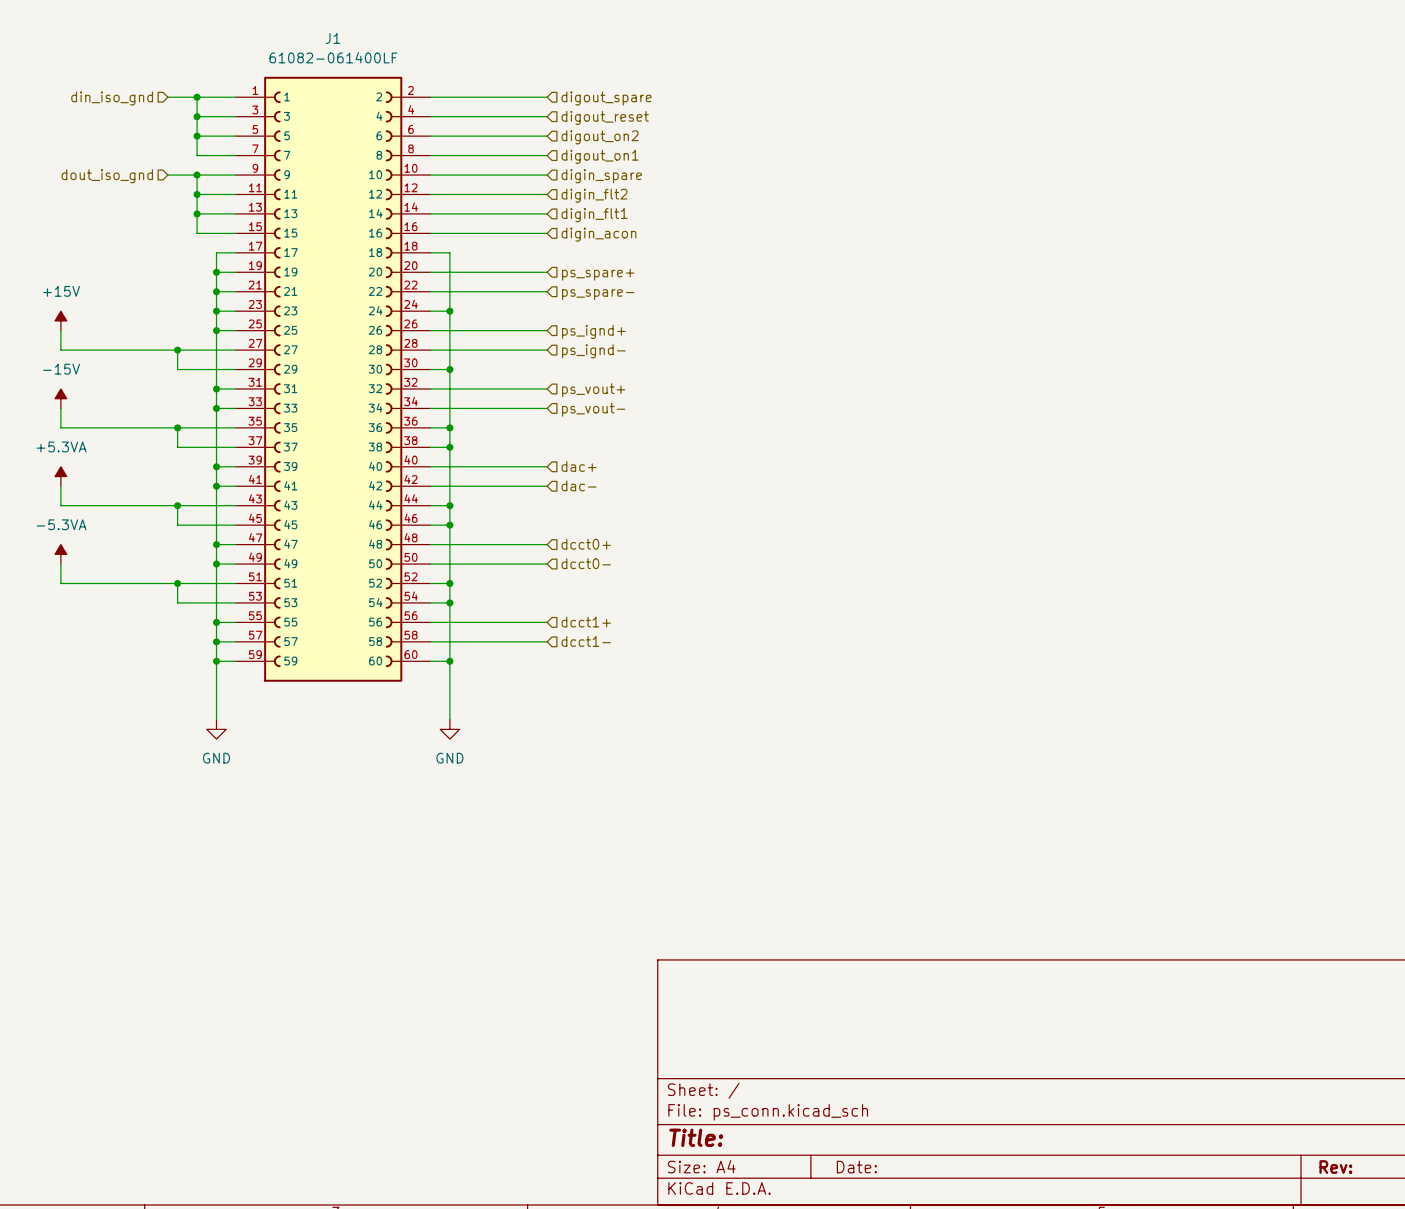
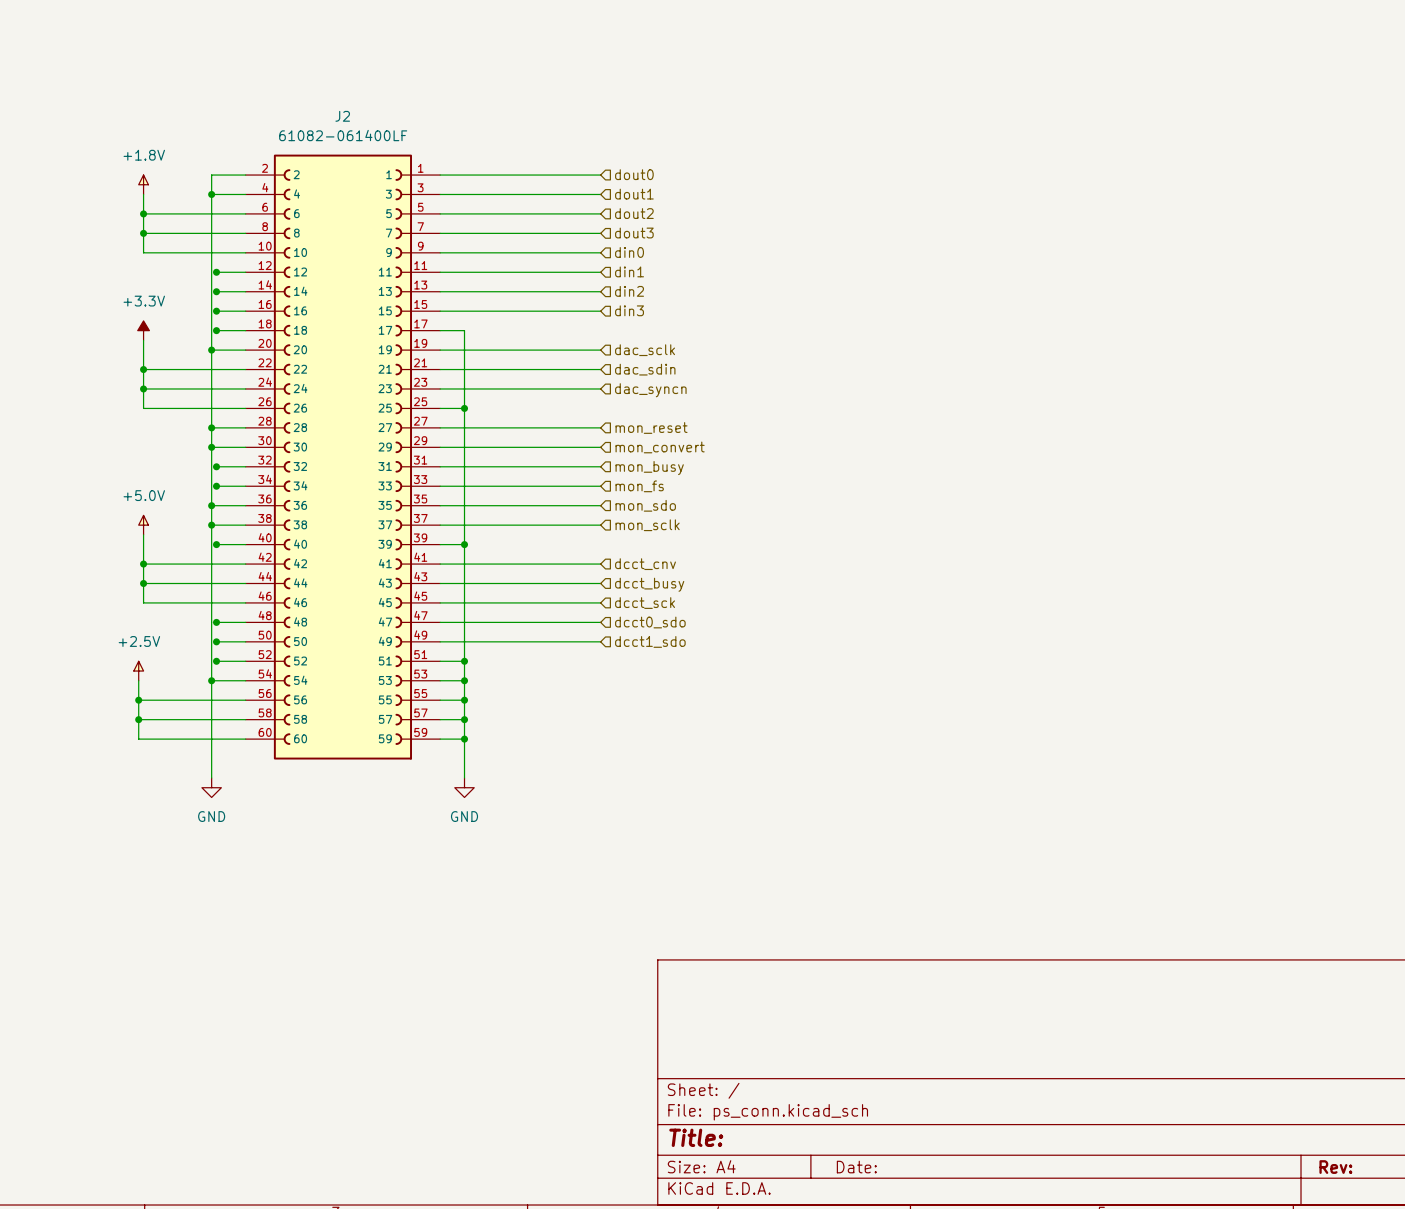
wire: (167, 97) (235, 97) -> none
wire: (197, 97) (197, 155) (235, 155) -> none
junction: (197, 97) -> none
wire: (430, 97) (547, 97) -> none
hierarchical label: din_iso_gnd (112, 98) -> none
hierarchical label: digout_spare (606, 98) -> none
wire: (197, 116) (235, 116) -> none
junction: (197, 116) -> none
wire: (430, 116) (547, 116) -> none
hierarchical label: digout_reset (605, 117) -> none
wire: (197, 136) (235, 136) -> none
junction: (197, 136) -> none
wire: (430, 136) (547, 136) -> none
hierarchical label: digout_on2 (600, 137) -> none
wire: (430, 155) (547, 155) -> none
hierarchical label: digout_on1 (600, 156) -> none
hierarchical label: none -> dout0 (634, 174)
wire: (167, 175) (211, 175) -> (211, 778) (211, 175)
wire: (197, 175) (197, 233) -> (143, 233) (197, 233)
junction: (197, 175) -> none
wire: none -> (547, 175) (600, 175)
hierarchical label: dout_iso_gnd (107, 176) -> none
hierarchical label: digin_spare (601, 176) -> none
power symbol: none -> +1.8V (143, 184)
wire: (197, 194) (211, 194) -> none
junction: (197, 194) -> none
junction: none -> (211, 194)
wire: none -> (547, 194) (600, 194)
hierarchical label: none -> dout1 (634, 194)
hierarchical label: digin_flt2 (594, 195) -> none
wire: none -> (143, 213) (197, 213)
junction: none -> (143, 213)
junction: (197, 213) -> none
wire: none -> (547, 213) (600, 213)
hierarchical label: none -> dout2 (634, 213)
hierarchical label: digin_flt1 (594, 215) -> none
junction: none -> (143, 233)
wire: none -> (547, 233) (600, 233)
hierarchical label: none -> dout3 (634, 233)
hierarchical label: digin_acon (598, 234) -> none
wire: (216, 252) (216, 719) -> (216, 252) (143, 252) (143, 194)
wire: (449, 252) (449, 719) -> (449, 252) (600, 252)
hierarchical label: none -> din0 (629, 252)
hierarchical label: none -> din1 (629, 271)
wire: none -> (547, 272) (600, 272)
hierarchical label: ps_spare+ (598, 274) -> none
wire: none -> (547, 291) (600, 291)
hierarchical label: none -> din2 (629, 291)
hierarchical label: ps_spare- (598, 294) -> none
hierarchical label: none -> din3 (629, 310)
wire: none -> (449, 311) (600, 311)
junction: (449, 311) -> none
power symbol: +15V (60, 320) -> none
wire: (60, 330) (60, 350) (211, 350) -> none
power symbol: none -> +3.3V (143, 330)
wire: (464, 330) (547, 330) -> (464, 330) (464, 778)
hierarchical label: ps_ignd+ (593, 331) -> none
wire: none -> (143, 340) (143, 408) (216, 408)
wire: (177, 350) (177, 369) -> (143, 369) (177, 369)
junction: (177, 350) -> none
junction: none -> (211, 350)
wire: none -> (547, 350) (600, 350)
hierarchical label: none -> dac_sclk (645, 350)
hierarchical label: ps_ignd- (593, 351) -> none
junction: none -> (143, 369)
wire: none -> (449, 369) (600, 369)
junction: (449, 369) -> none
hierarchical label: none -> dac_sdin (645, 369)
J1: 61082-061400LF (333, 379) -> none
wire: none -> (143, 388) (216, 388)
junction: none -> (143, 388)
junction: (216, 388) -> none
wire: none -> (547, 388) (600, 388)
hierarchical label: ps_vout+ (593, 390) -> none
hierarchical label: none -> dac_syncn (650, 390)
power symbol: -15V (60, 398) -> none
wire: (60, 408) (60, 427) (211, 427) -> none
junction: (216, 408) -> none
wire: (464, 408) (547, 408) -> none
junction: none -> (464, 408)
hierarchical label: ps_vout- (593, 409) -> none
wire: (177, 427) (177, 447) (211, 447) -> none
junction: (177, 427) -> none
junction: none -> (211, 427)
wire: none -> (449, 427) (600, 427)
junction: (449, 427) -> none
hierarchical label: none -> mon_reset (651, 427)
junction: none -> (211, 447)
wire: none -> (449, 447) (600, 447)
junction: (449, 447) -> none
hierarchical label: none -> mon_convert (660, 447)
J2: none -> 61082-061400LF (342, 457)
wire: none -> (547, 466) (600, 466)
hierarchical label: dac+ (579, 466) -> none
hierarchical label: none -> mon_busy (649, 468)
power symbol: +5.3VA (60, 476) -> none
hierarchical label: dac- (579, 485) -> none
wire: (60, 486) (60, 505) (211, 505) -> none
wire: none -> (547, 486) (600, 486)
hierarchical label: none -> mon_fs (639, 486)
wire: (177, 505) (177, 525) (211, 525) -> none
junction: (177, 505) -> none
junction: none -> (211, 505)
wire: none -> (449, 505) (600, 505)
junction: (449, 505) -> none
hierarchical label: none -> mon_sdo (645, 505)
power symbol: none -> +5.0V (143, 525)
junction: none -> (211, 525)
wire: none -> (449, 525) (600, 525)
junction: (449, 525) -> none
hierarchical label: none -> mon_sclk (647, 525)
wire: (464, 544) (547, 544) -> none
junction: none -> (464, 544)
hierarchical label: dcct0+ (586, 544) -> none
power symbol: -5.3VA (60, 554) -> none
hierarchical label: dcct0- (586, 563) -> none
wire: (60, 564) (60, 583) (143, 583) -> none
wire: none -> (143, 564) (216, 564)
junction: none -> (143, 564)
junction: (216, 564) -> none
wire: none -> (547, 564) (600, 564)
hierarchical label: none -> dcct_cnv (645, 564)
junction: none -> (143, 583)
wire: (177, 583) (177, 602) -> (143, 534) (143, 602) (177, 602)
junction: (177, 583) -> none
wire: none -> (449, 583) (600, 583)
junction: (449, 583) -> none
hierarchical label: none -> dcct_busy (649, 584)
wire: none -> (449, 602) (600, 602)
junction: (449, 602) -> none
hierarchical label: none -> dcct_sck (645, 603)
wire: none -> (547, 622) (600, 622)
hierarchical label: dcct1+ (586, 622) -> none
hierarchical label: none -> dcct0_sdo (650, 622)
wire: none -> (547, 641) (600, 641)
hierarchical label: dcct1- (586, 641) -> none
hierarchical label: none -> dcct1_sdo (650, 641)
wire: none -> (449, 661) (464, 661)
junction: (449, 661) -> none
junction: none -> (464, 661)
power symbol: none -> +2.5V (138, 671)
wire: none -> (138, 680) (138, 739) (245, 739)
wire: none -> (211, 680) (245, 680)
junction: none -> (211, 680)
wire: none -> (440, 680) (464, 680)
junction: none -> (464, 680)
wire: none -> (138, 700) (245, 700)
junction: none -> (138, 700)
wire: none -> (440, 700) (464, 700)
junction: none -> (464, 700)
wire: none -> (138, 719) (245, 719)
junction: none -> (138, 719)
wire: none -> (440, 719) (464, 719)
junction: none -> (464, 719)
power symbol position: GND (216, 729) -> GND (211, 787)
power symbol position: GND (449, 729) -> GND (464, 787)
wire: none -> (440, 739) (464, 739)
junction: none -> (464, 739)

